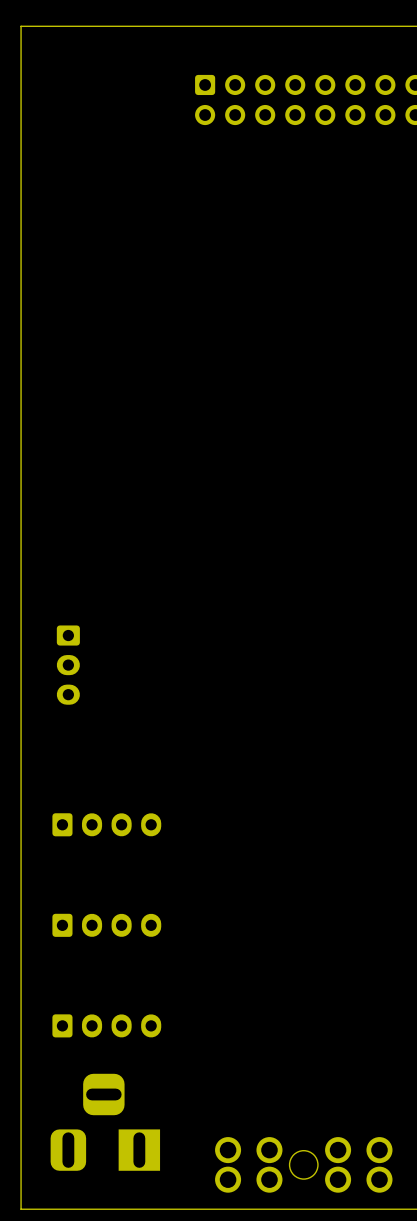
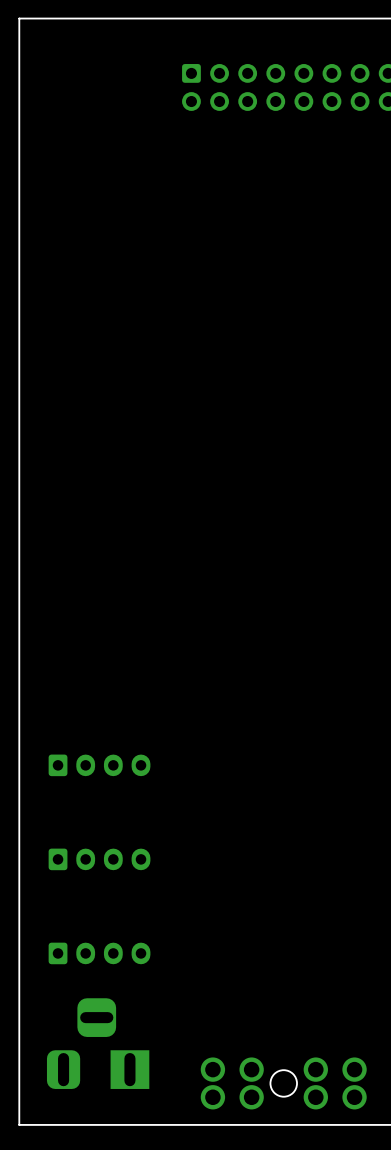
part: (68, 665) -> none

